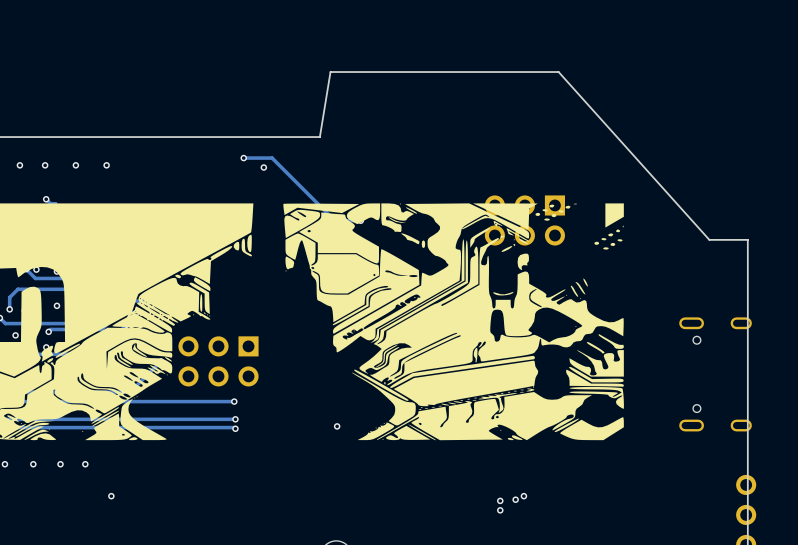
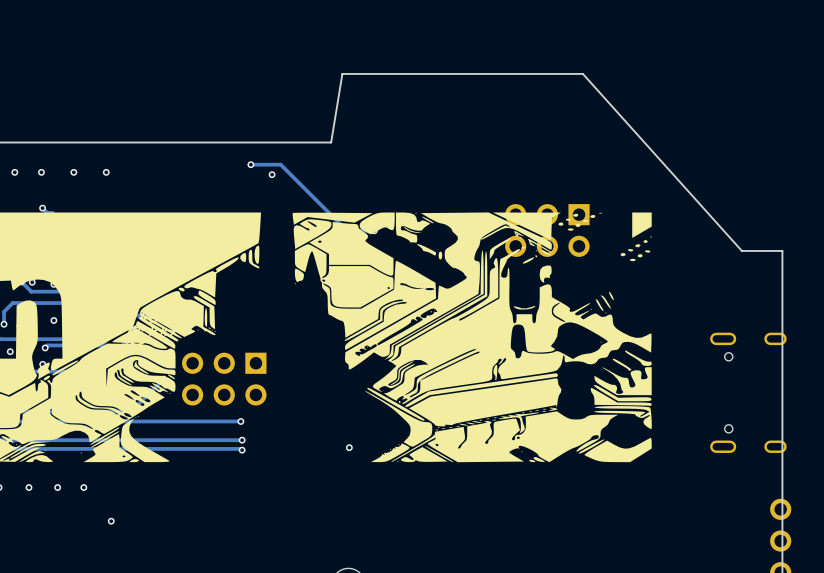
via: (523, 496) -> none
via: (515, 499) -> none
via: (500, 500) -> none
via: (500, 510) -> none

